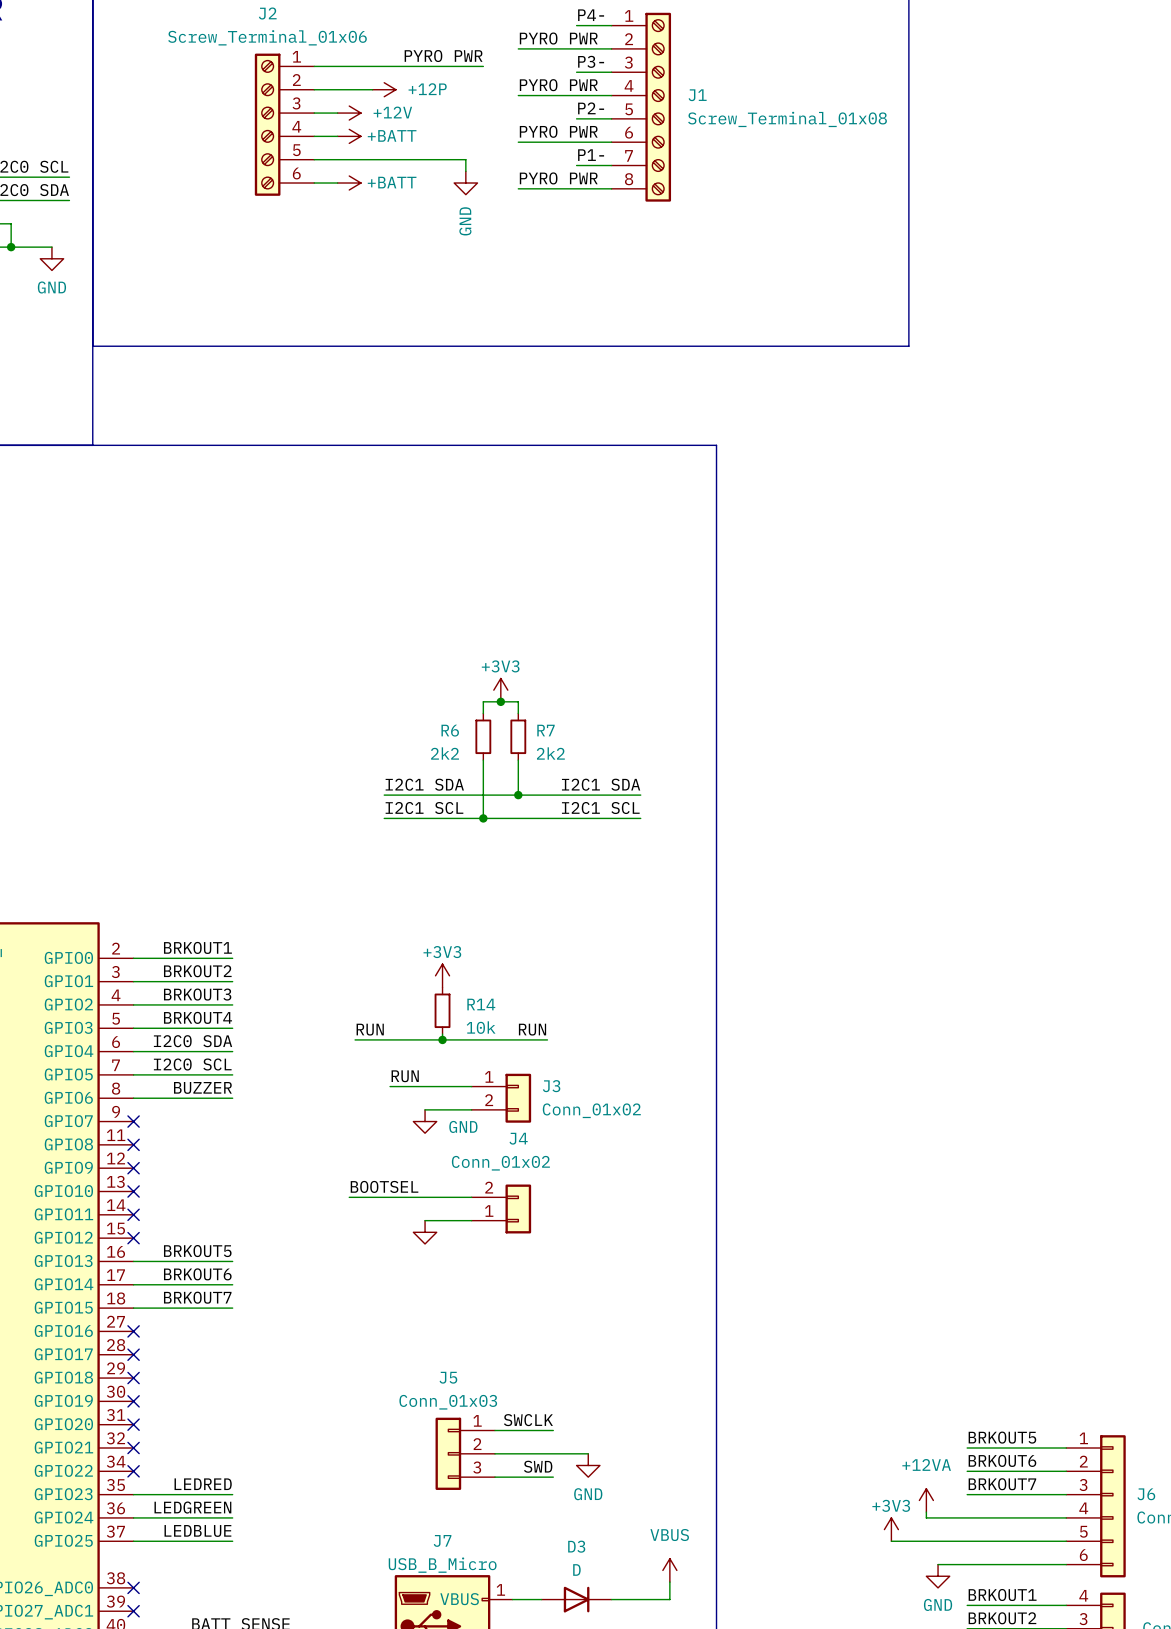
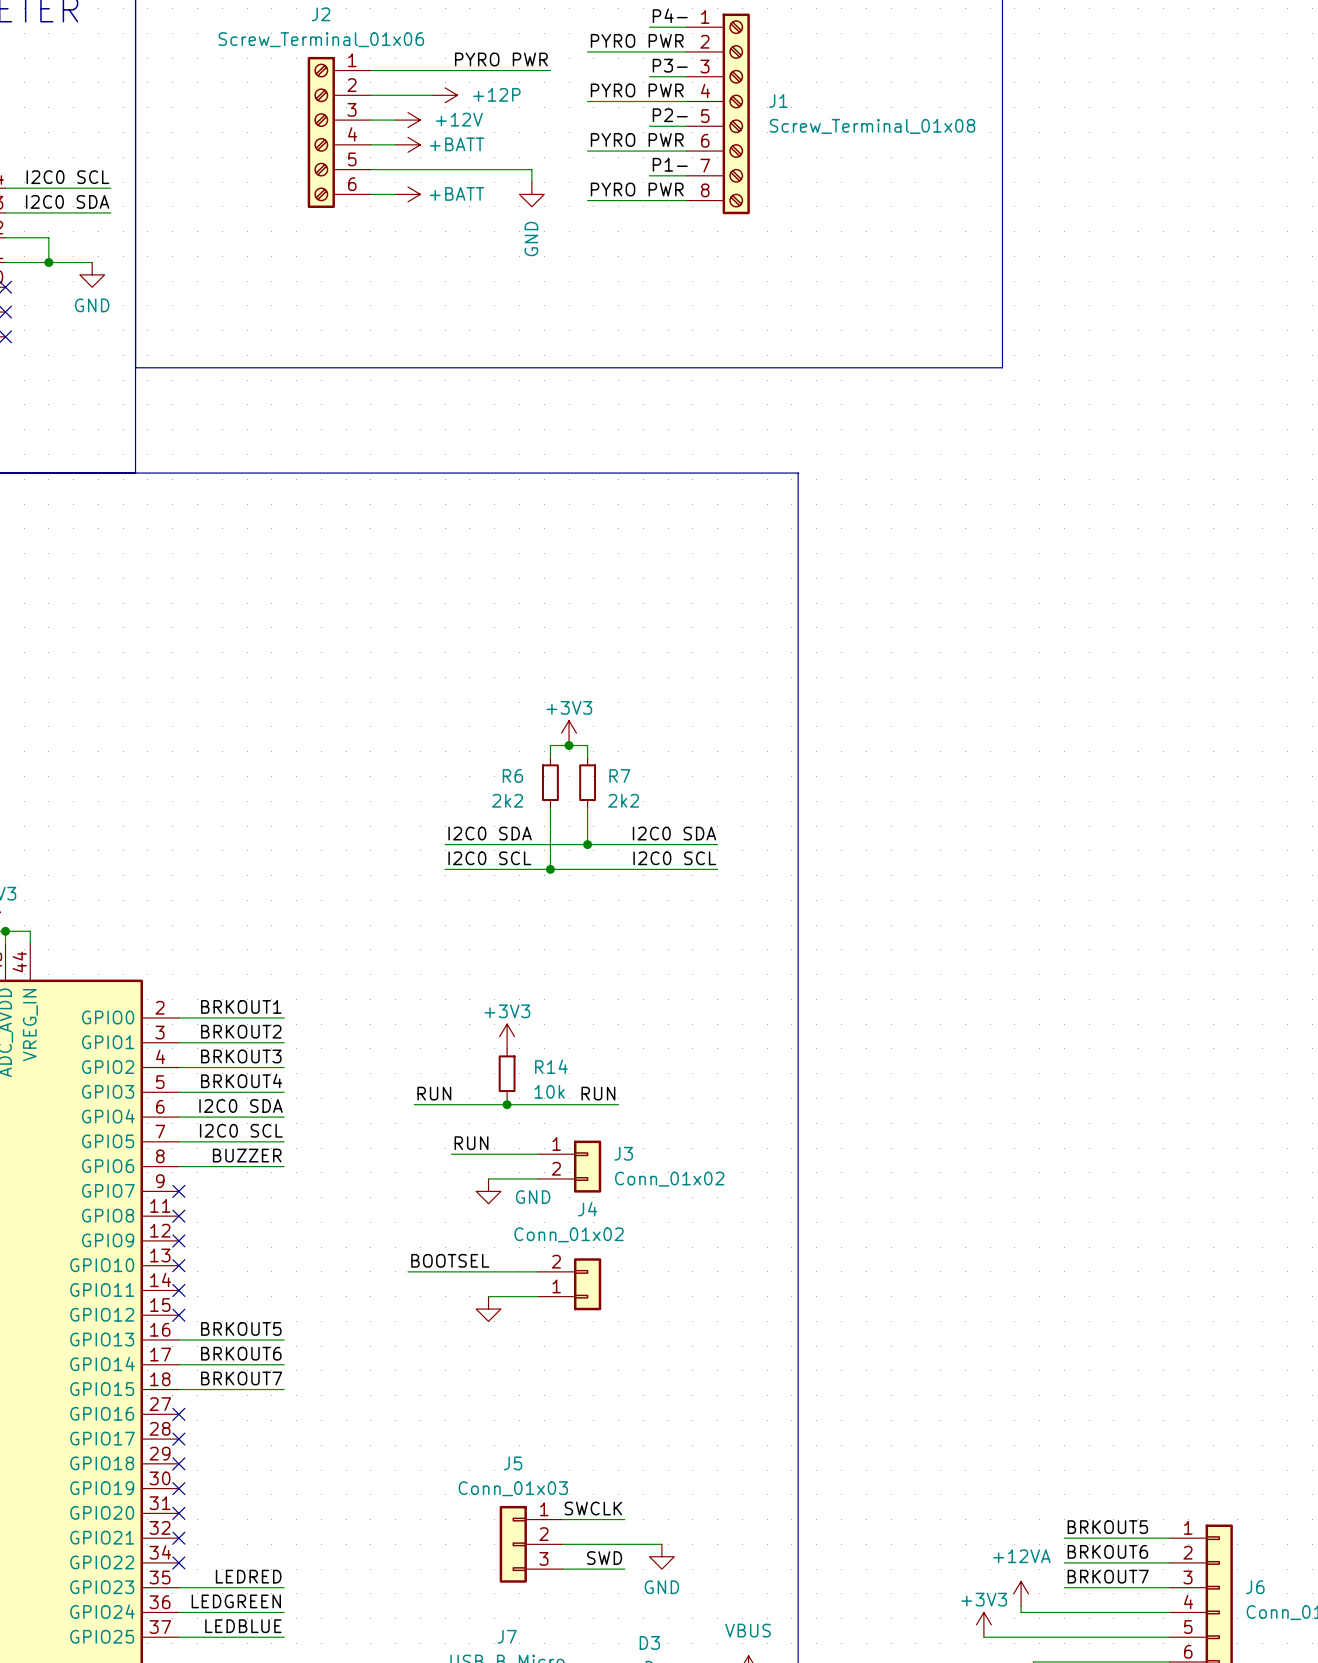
label: I2C1 SDA (424, 784) -> I2C0 SDA (490, 833)
label: I2C1 SDA (601, 784) -> I2C0 SDA (674, 833)
label: I2C1 SCL (424, 808) -> I2C0 SCL (489, 858)
label: I2C1 SCL (600, 808) -> I2C0 SCL (674, 858)

